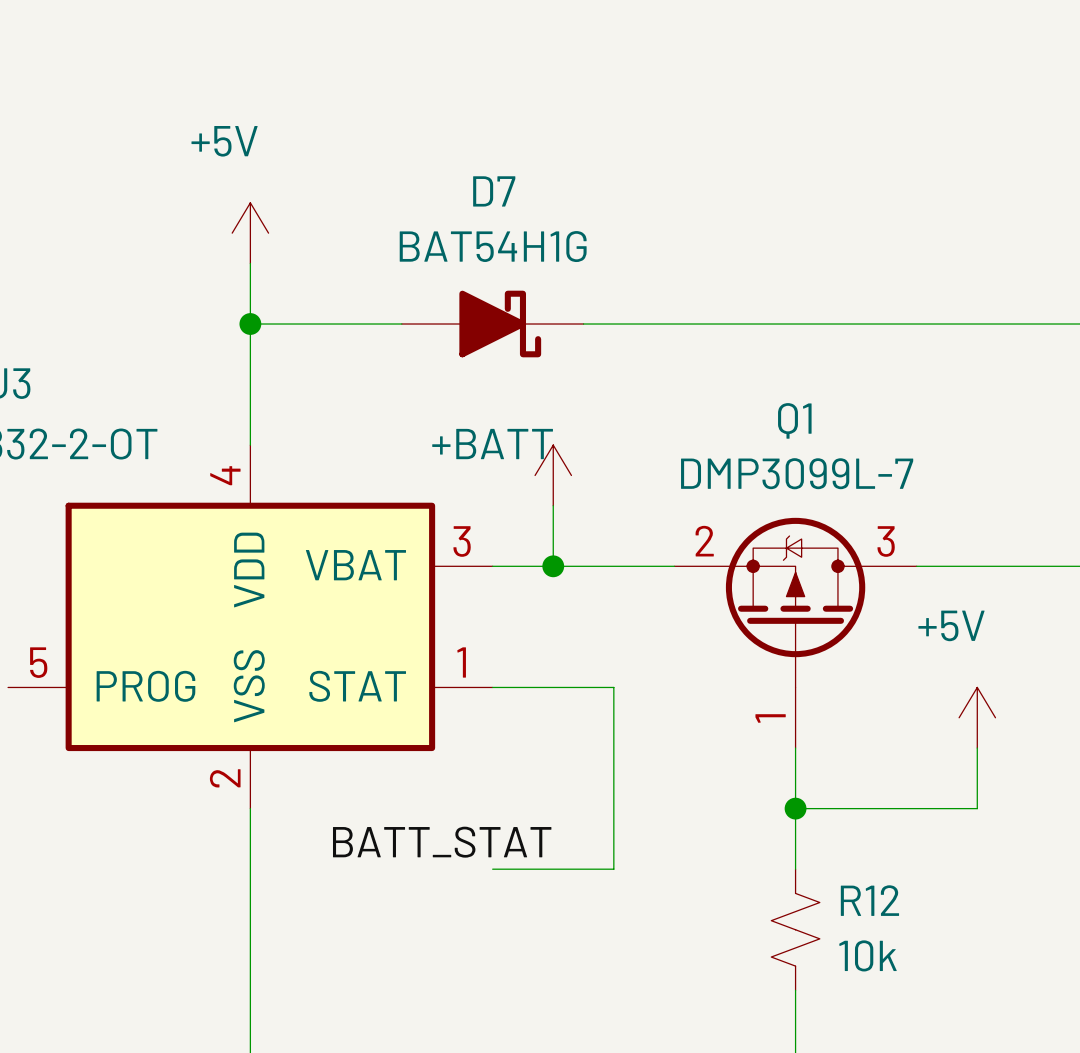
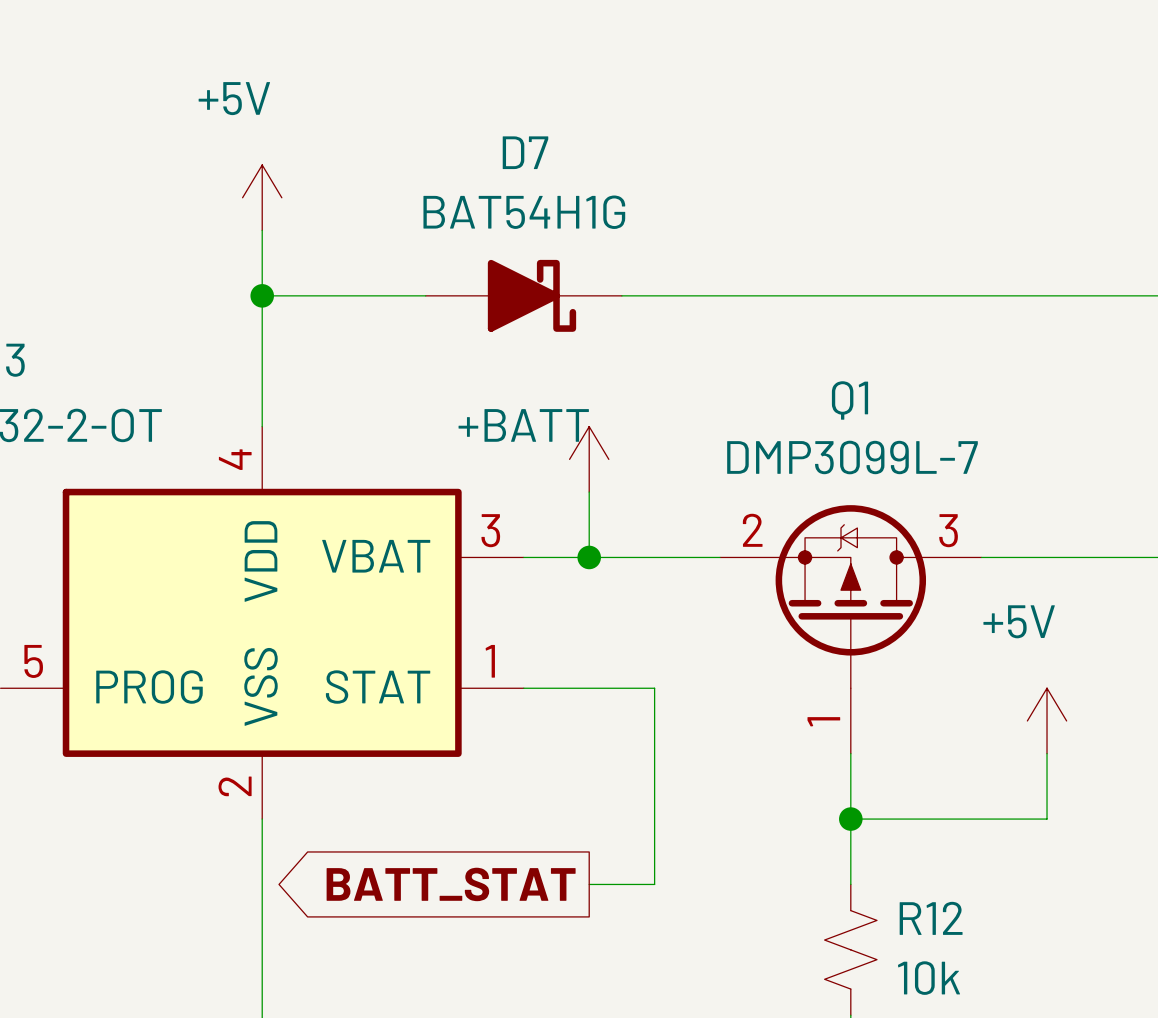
label: BATT_STAT (442, 842) -> none
global label: none -> BATT_STAT (451, 884)
wire: (492, 869) (553, 869) -> none

